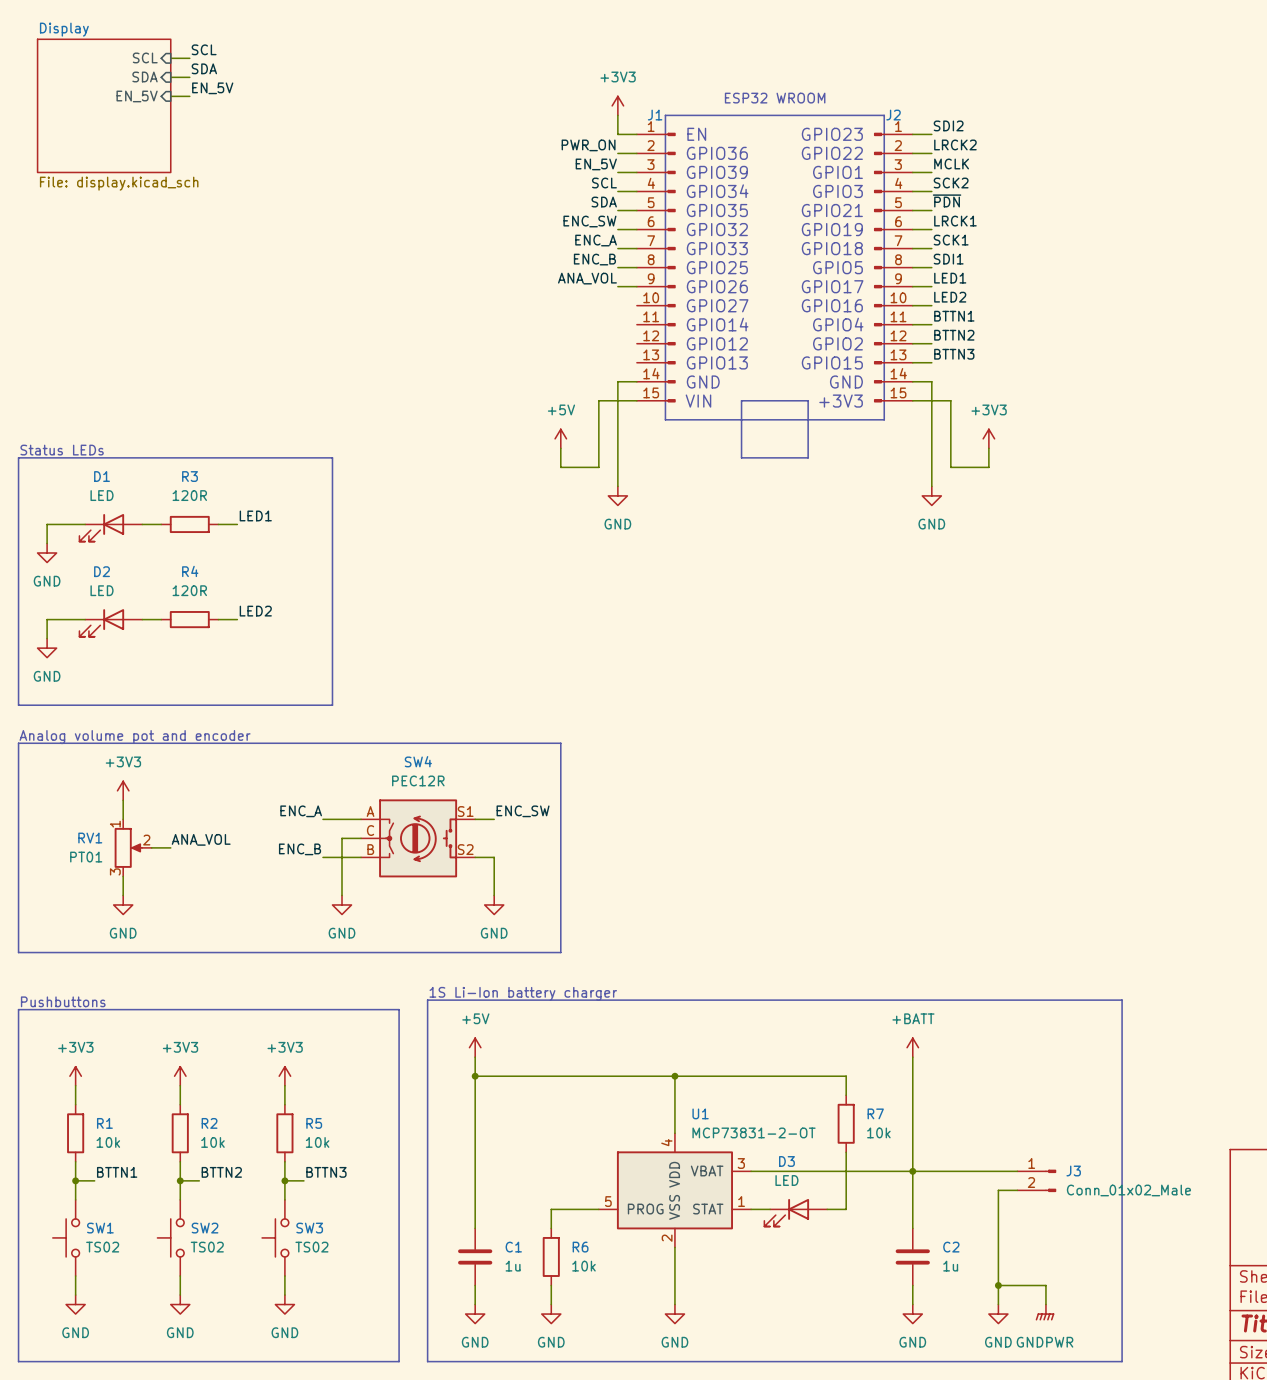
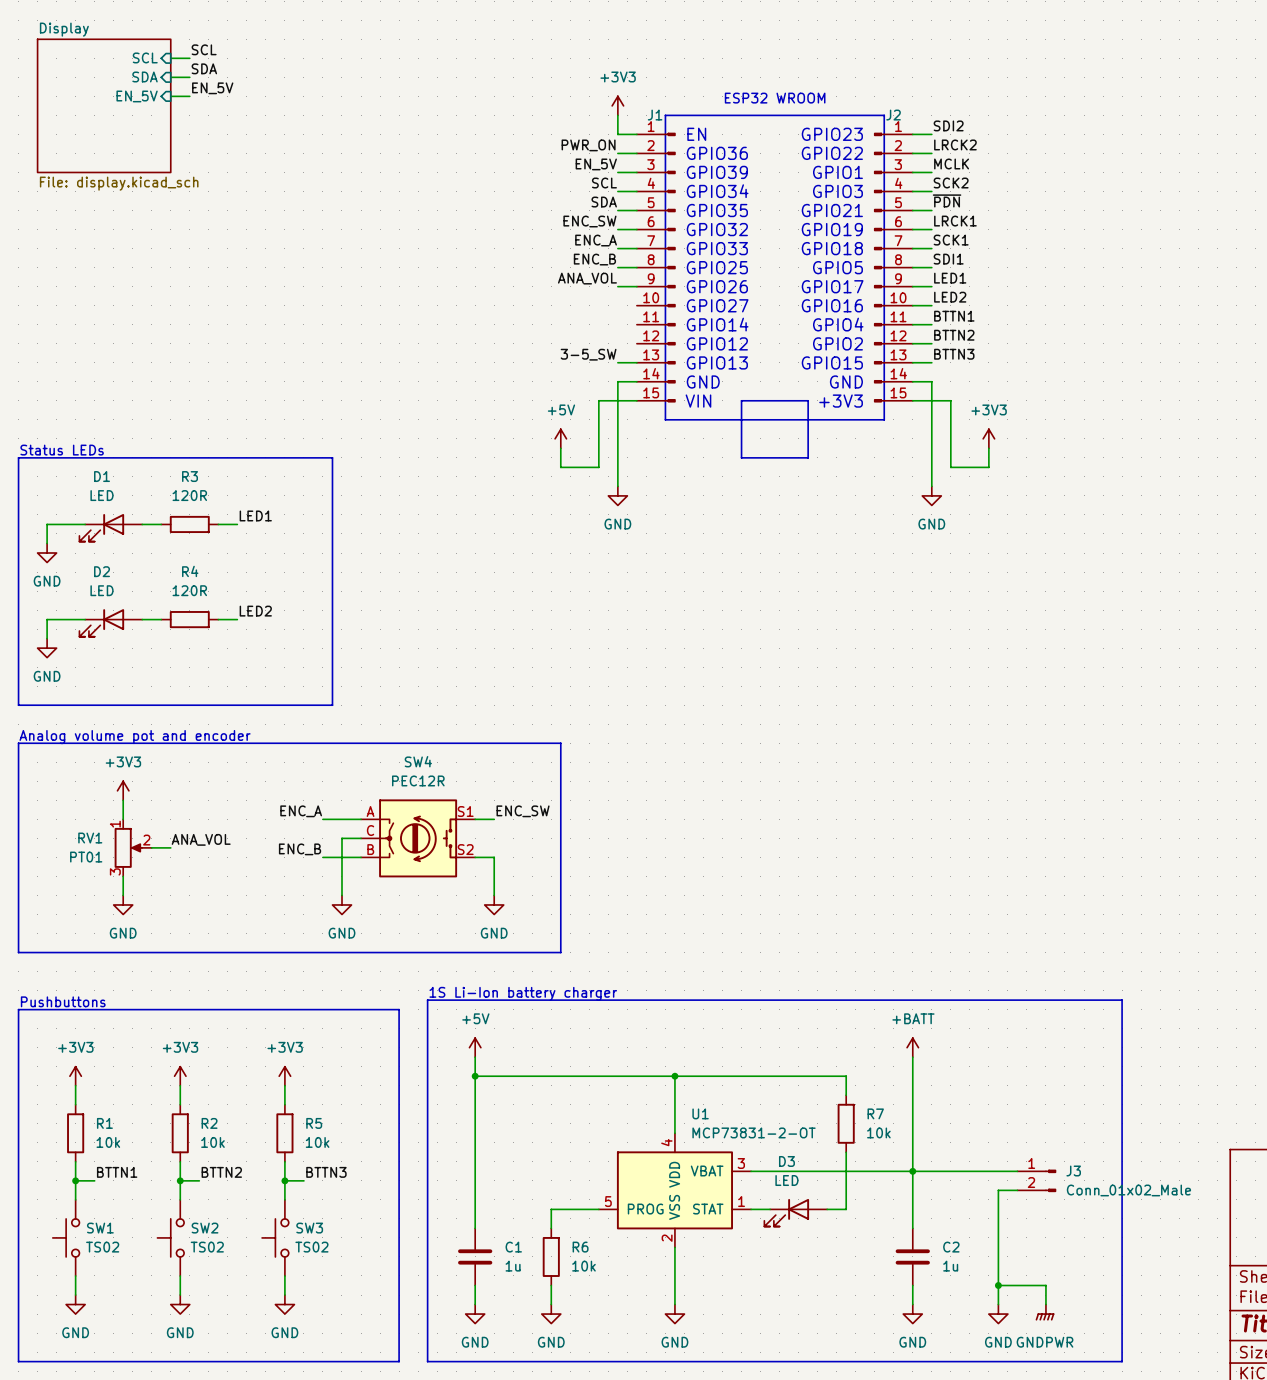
label: none -> 3-5_SW (588, 354)
wire: none -> (617, 362) (636, 362)

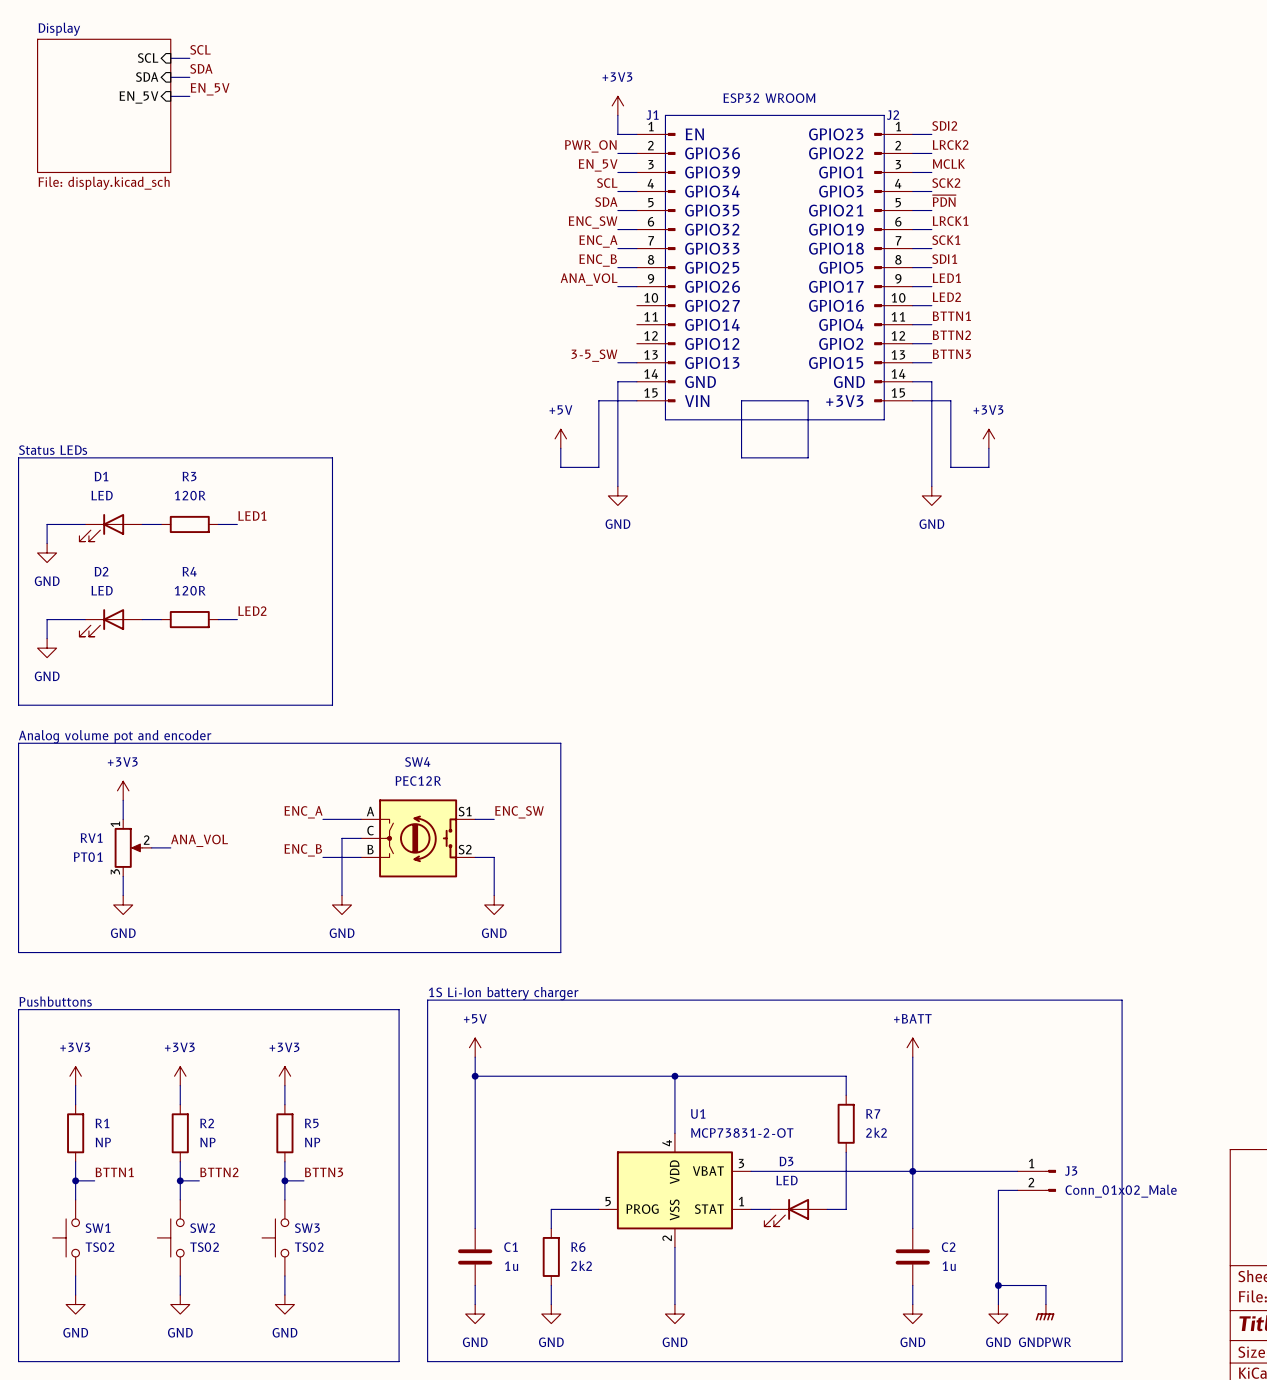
R7 value: 10k (878, 1132) -> 2k2 (876, 1132)
R1 value: 10k (108, 1142) -> NP (103, 1142)
R2 value: 10k (212, 1142) -> NP (207, 1142)
R5 value: 10k (317, 1142) -> NP (312, 1142)
R6 value: 10k (583, 1266) -> 2k2 (581, 1265)

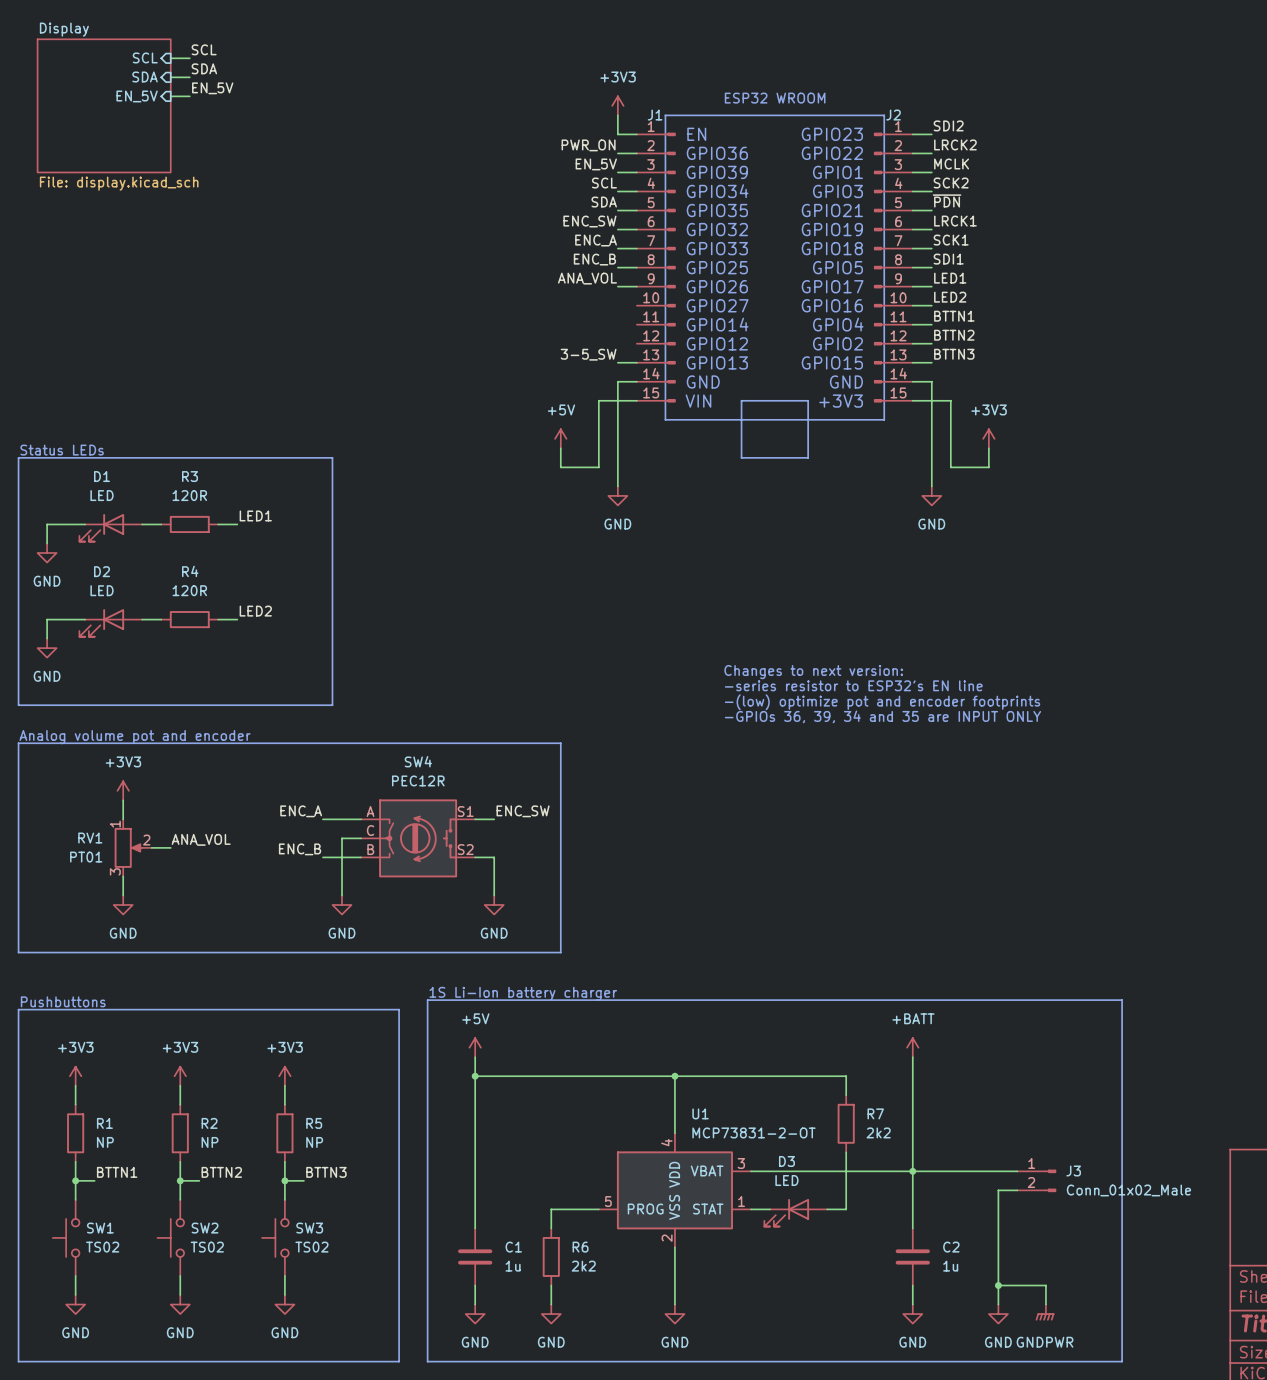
text: none -> Changes to next version: (813, 672)
text: none -> -series resistor to ESP32's EN line (853, 685)
text: none -> -(low) optimize pot and encoder footprints (882, 702)
text: none -> -GPIOs 36, 39, 34 and 35 are INPUT ONLY (882, 716)

